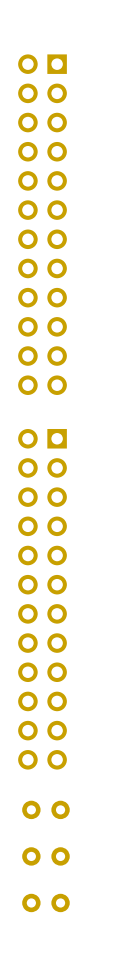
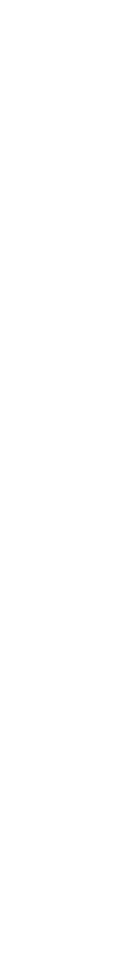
part: (42, 224) -> none
part: (42, 599) -> none
part: (45, 809) -> none
part: (45, 856) -> none
part: (45, 902) -> none

